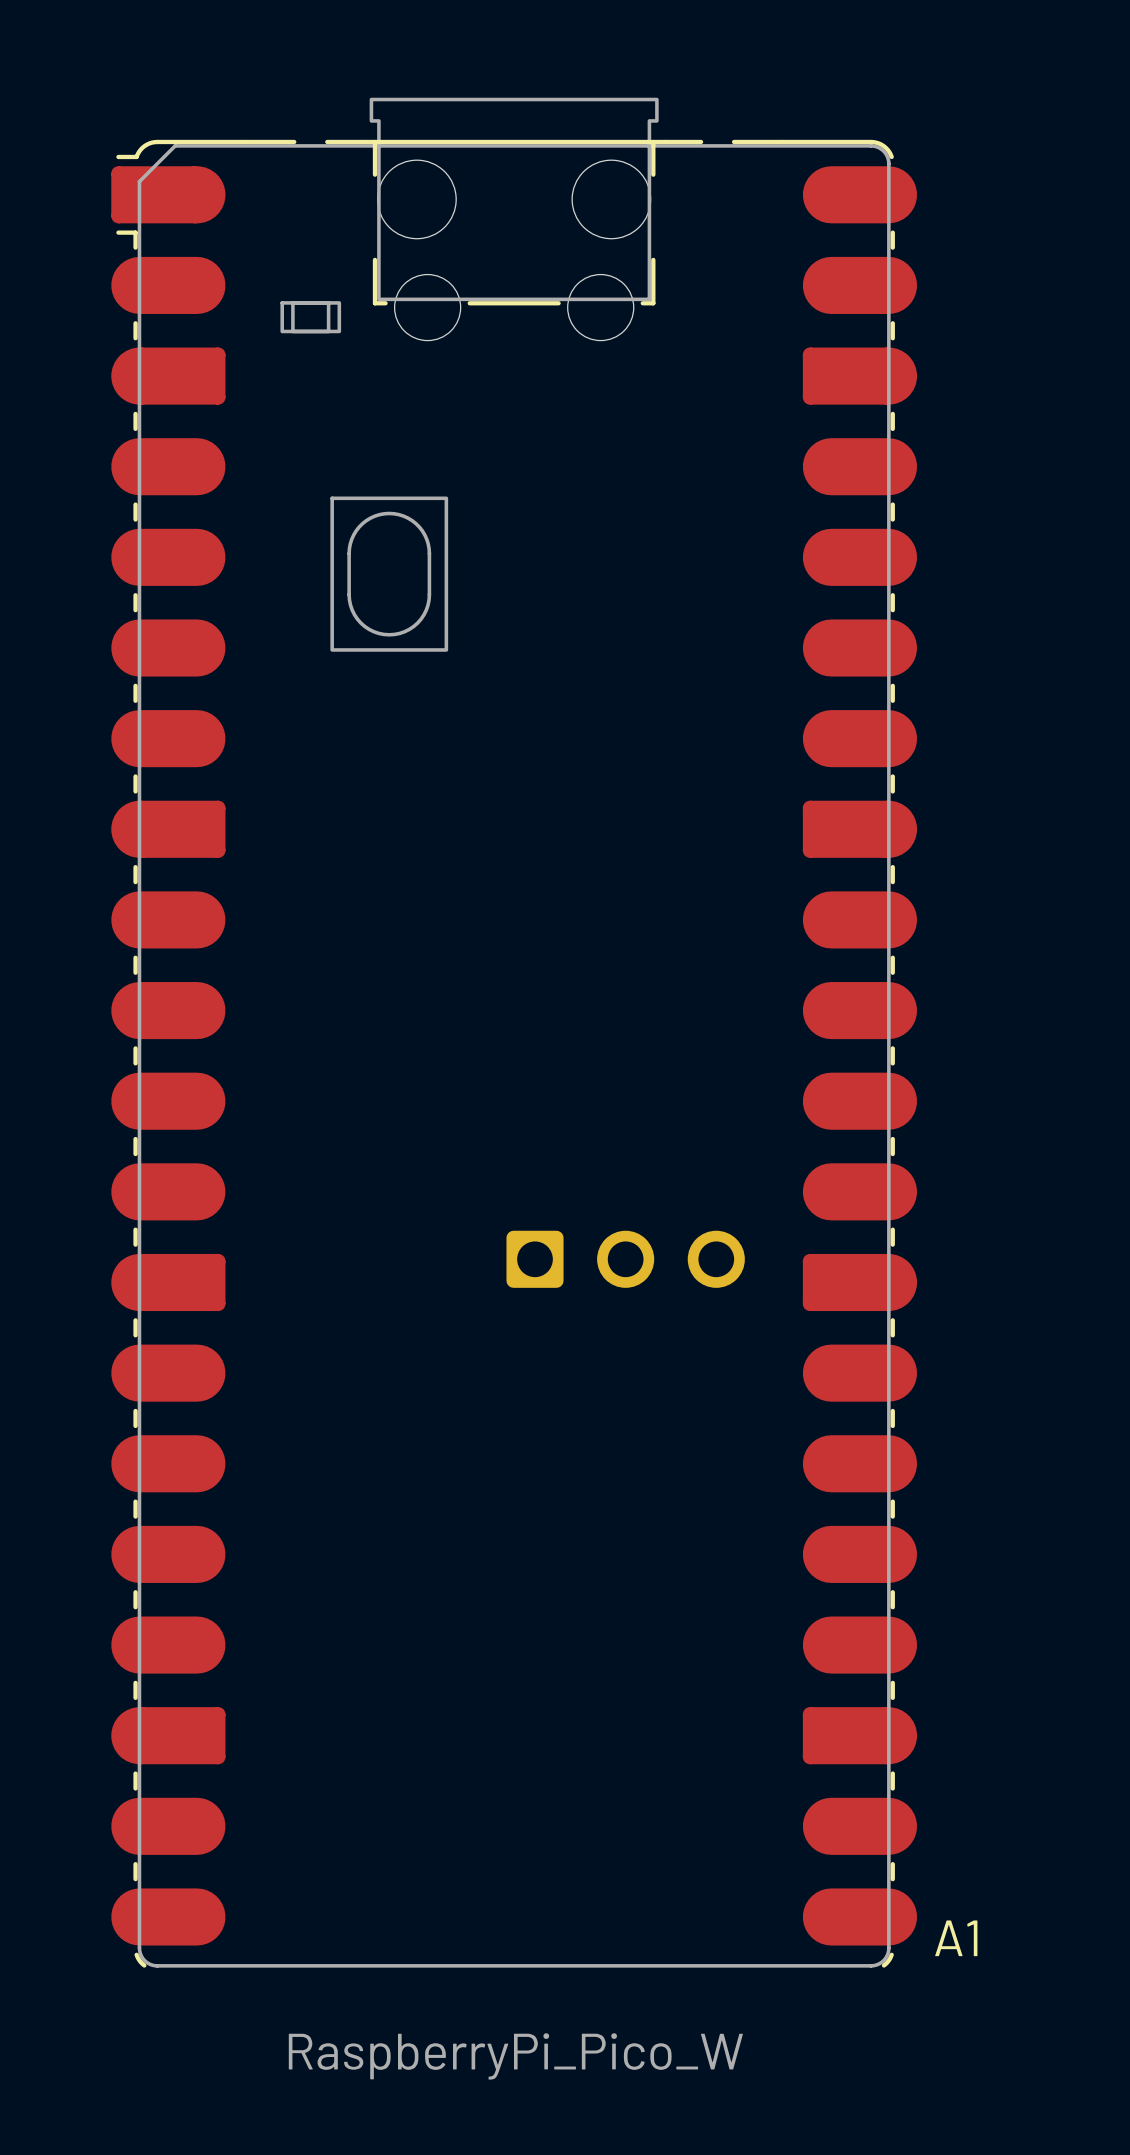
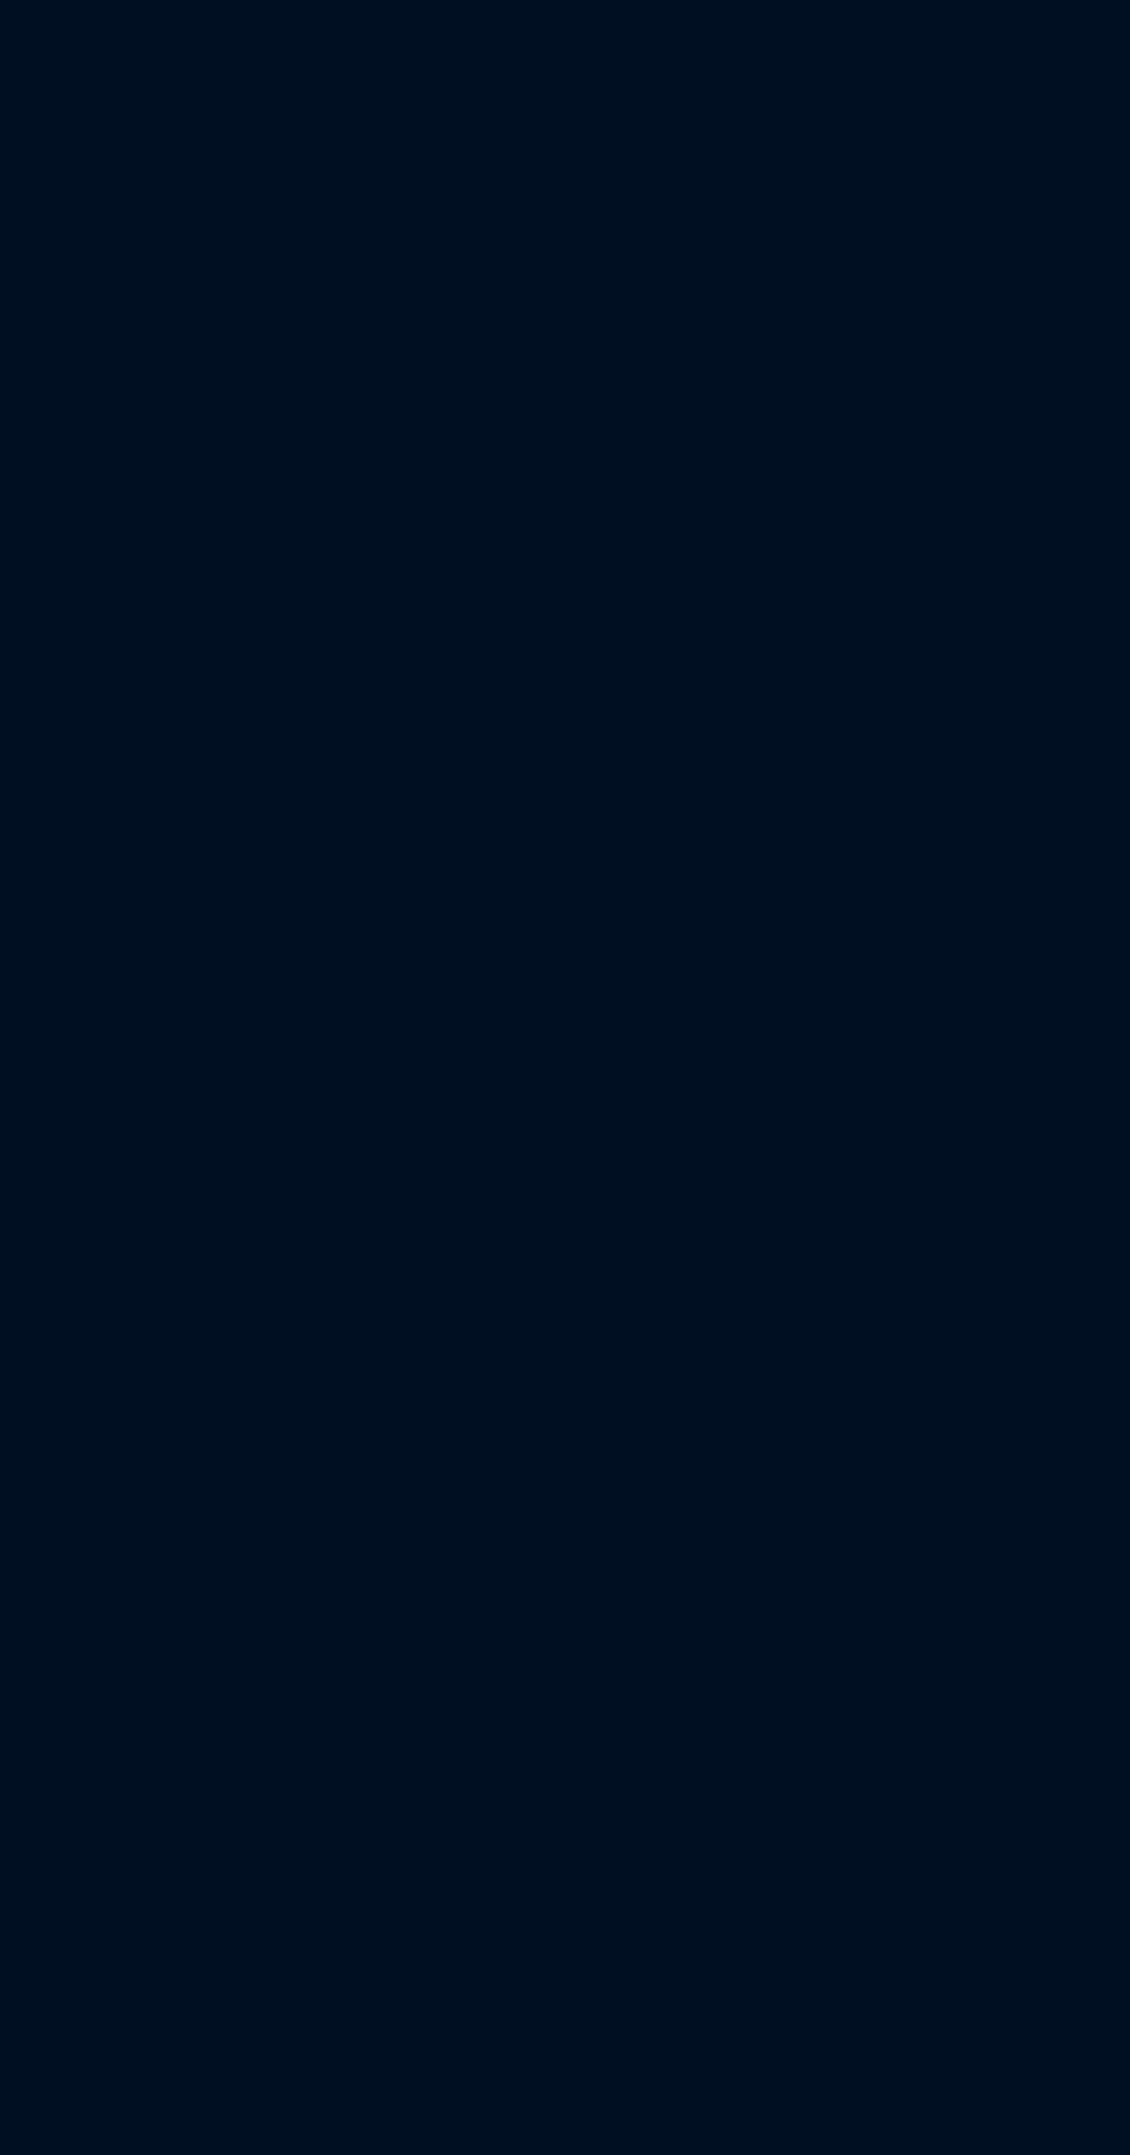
A1: RaspberryPi_Pico_W (514, 1032) -> none

